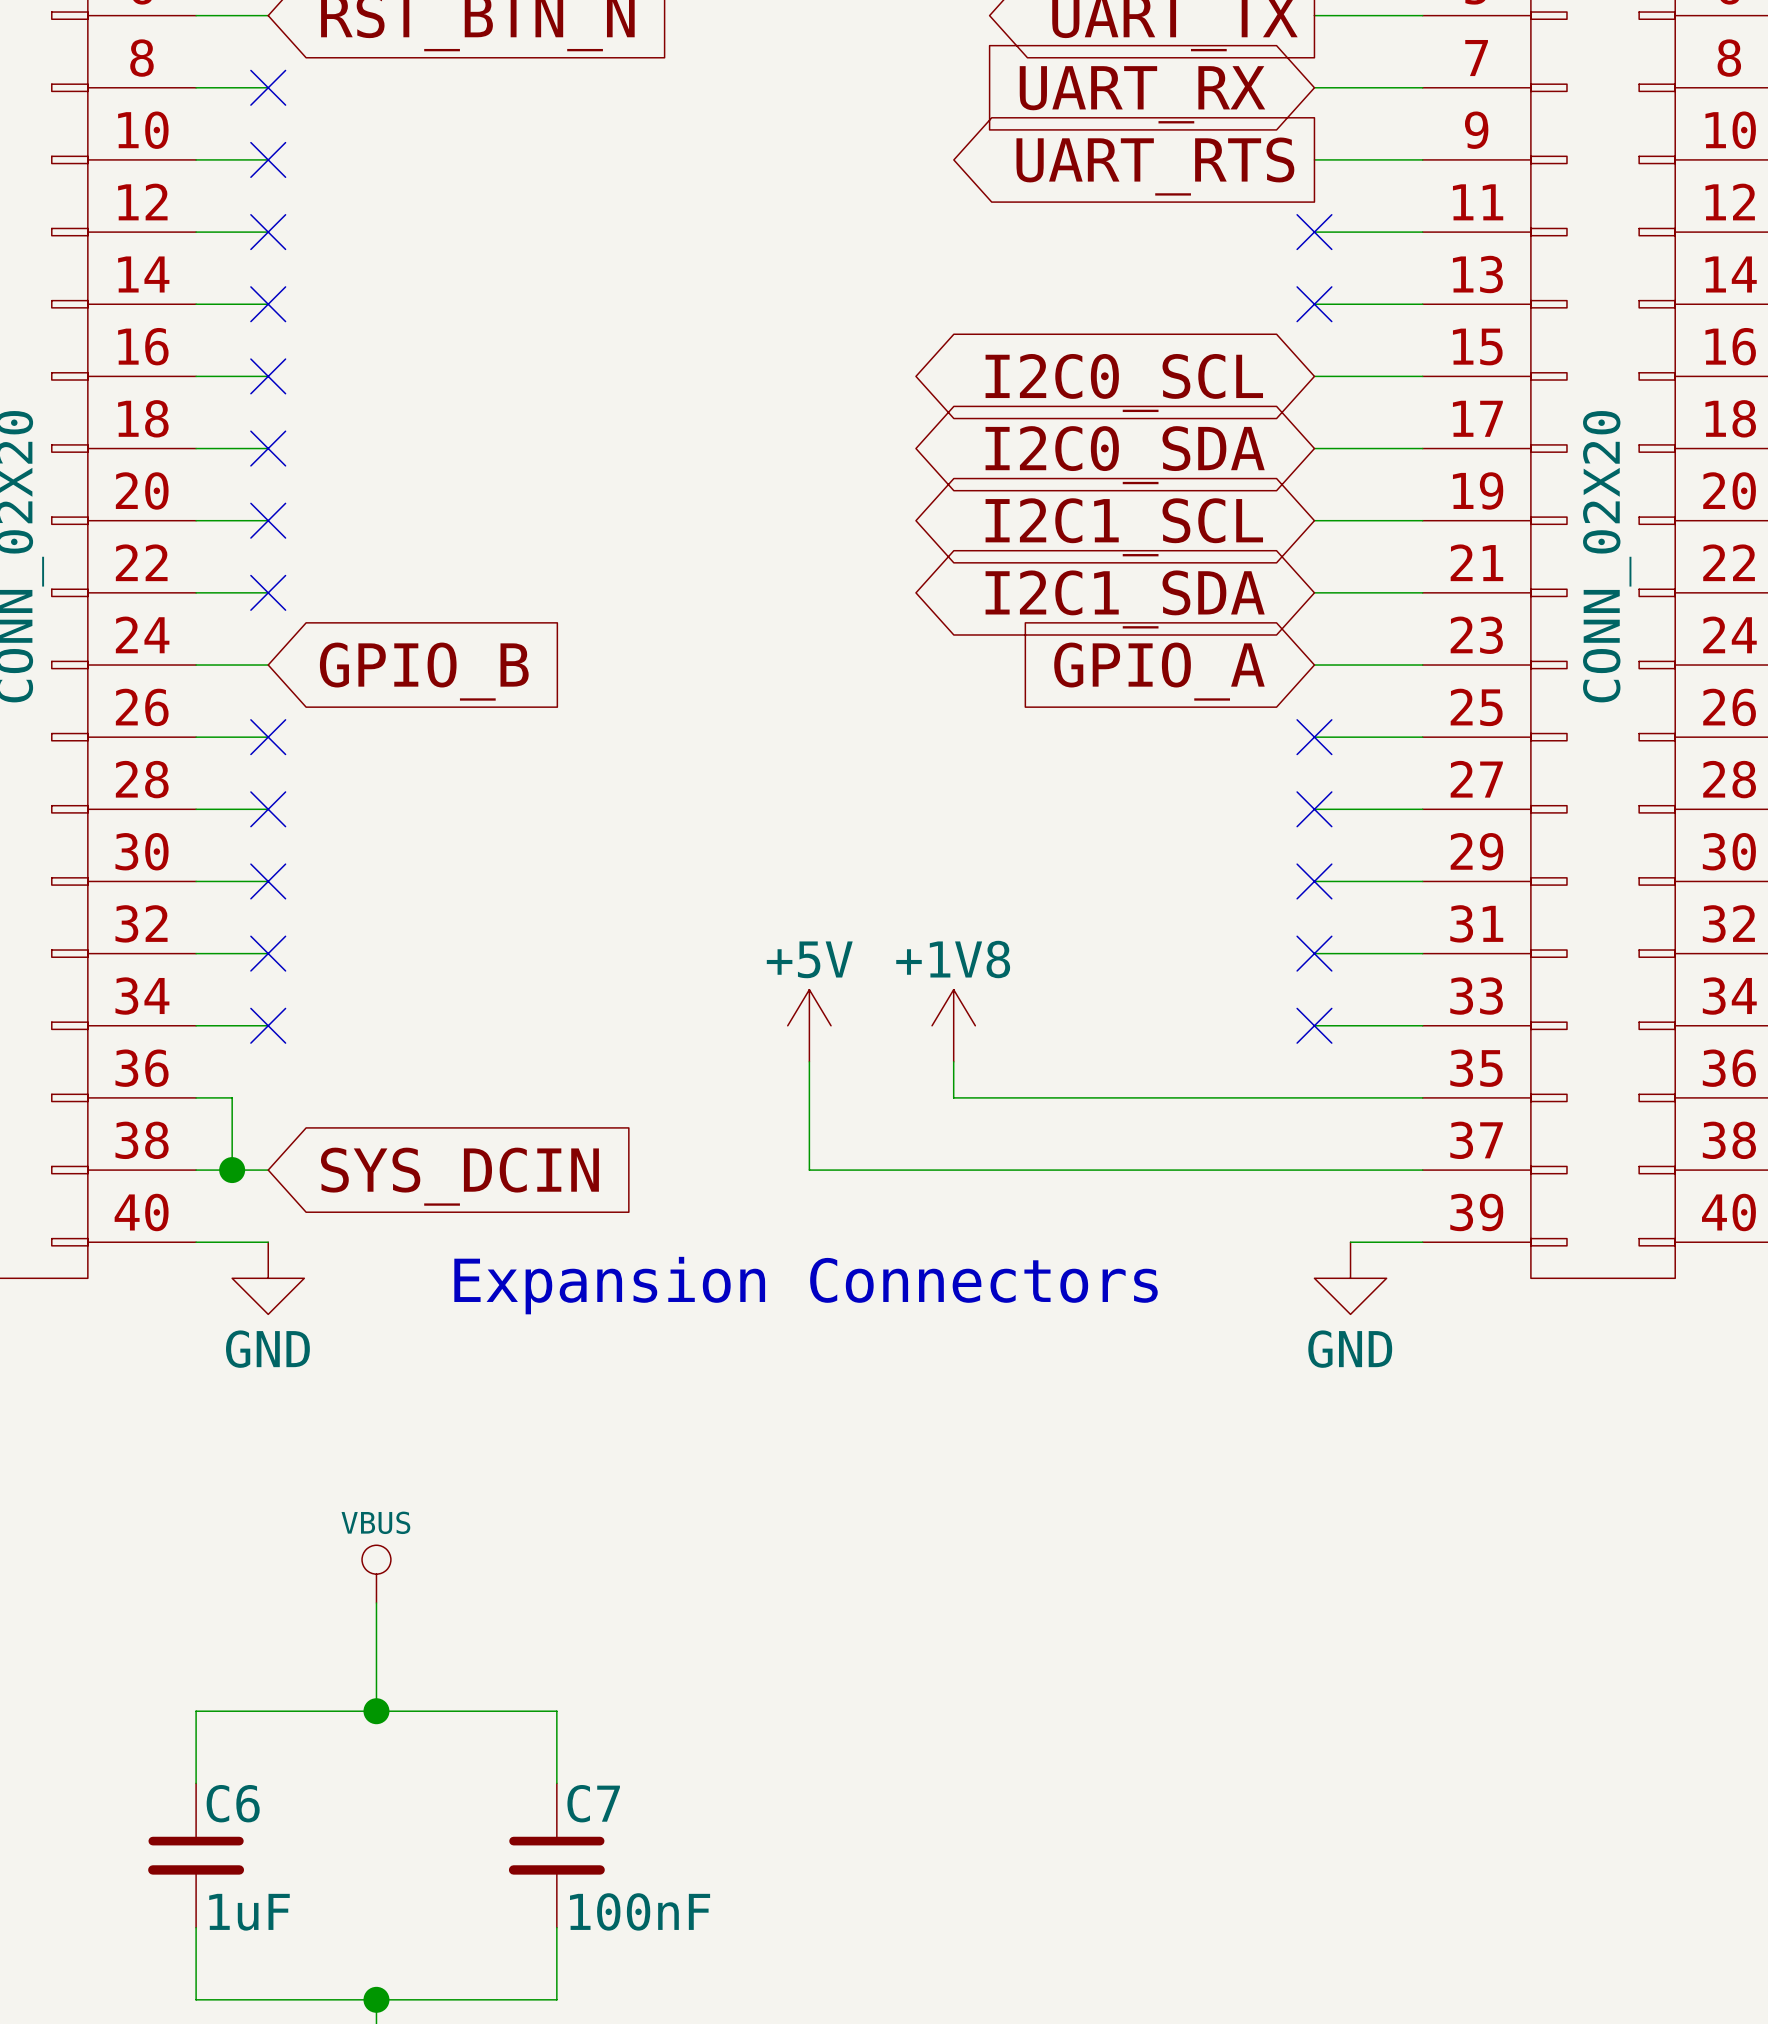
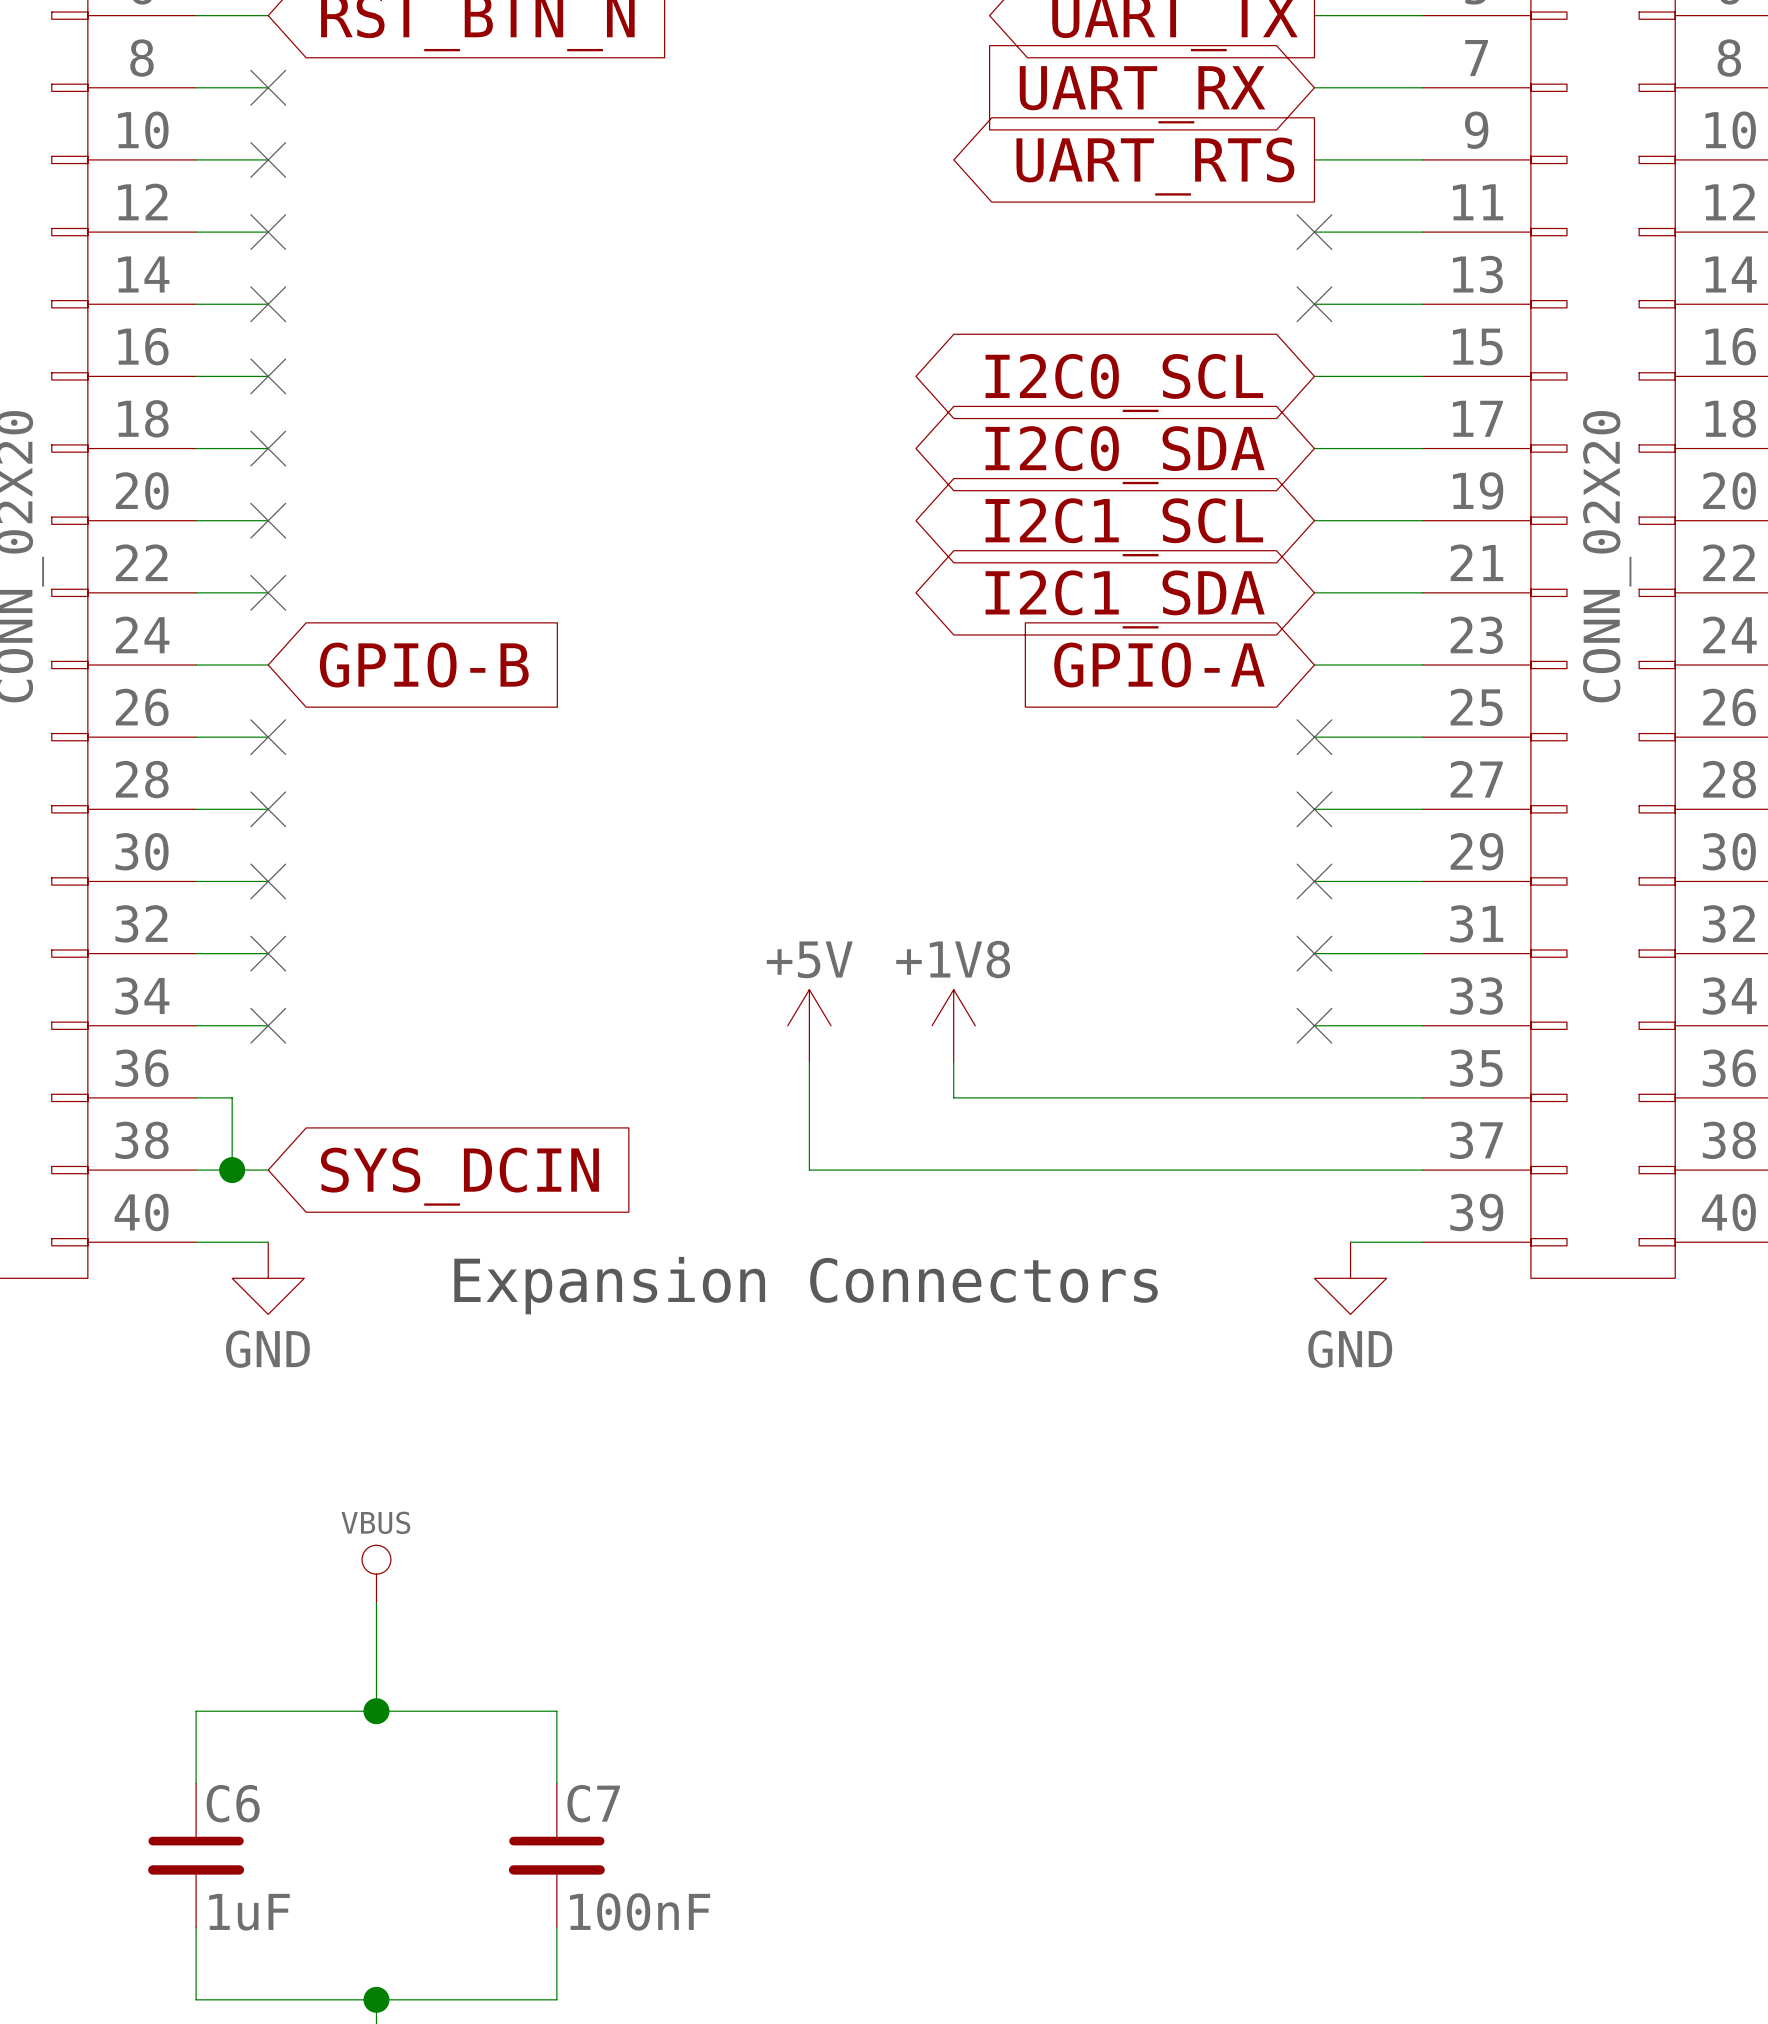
global label: GPIO_B (424, 671) -> GPIO-B (424, 665)
global label: GPIO_A (1159, 671) -> GPIO-A (1159, 665)

